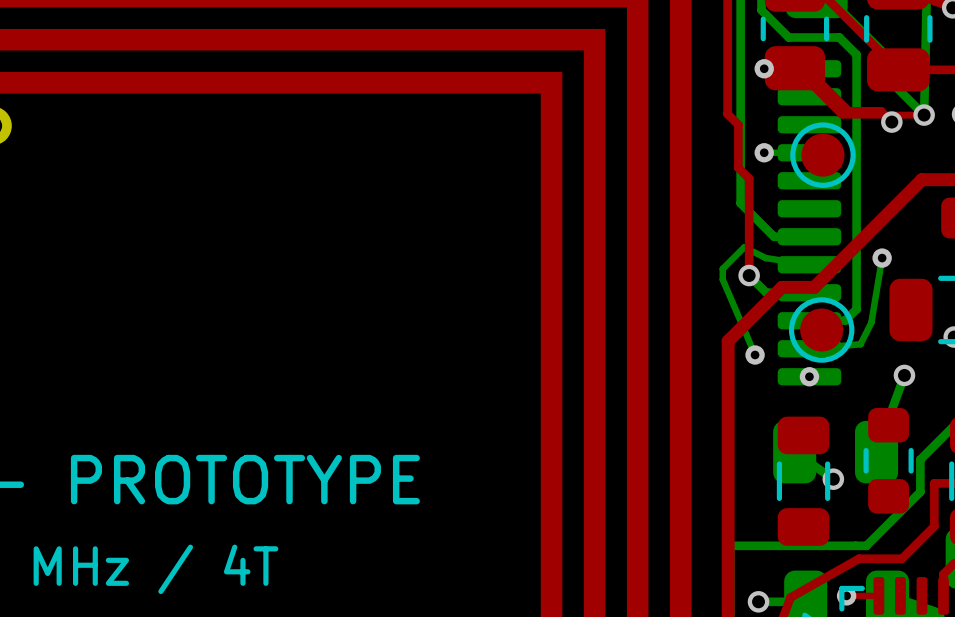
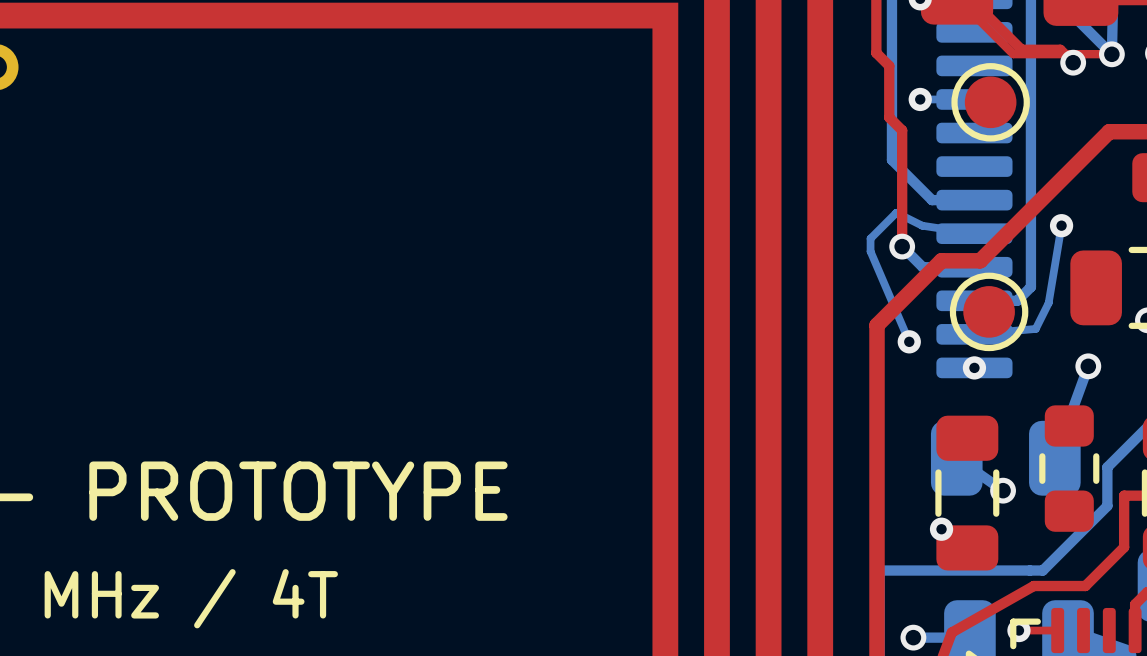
via: none -> (941, 529)

